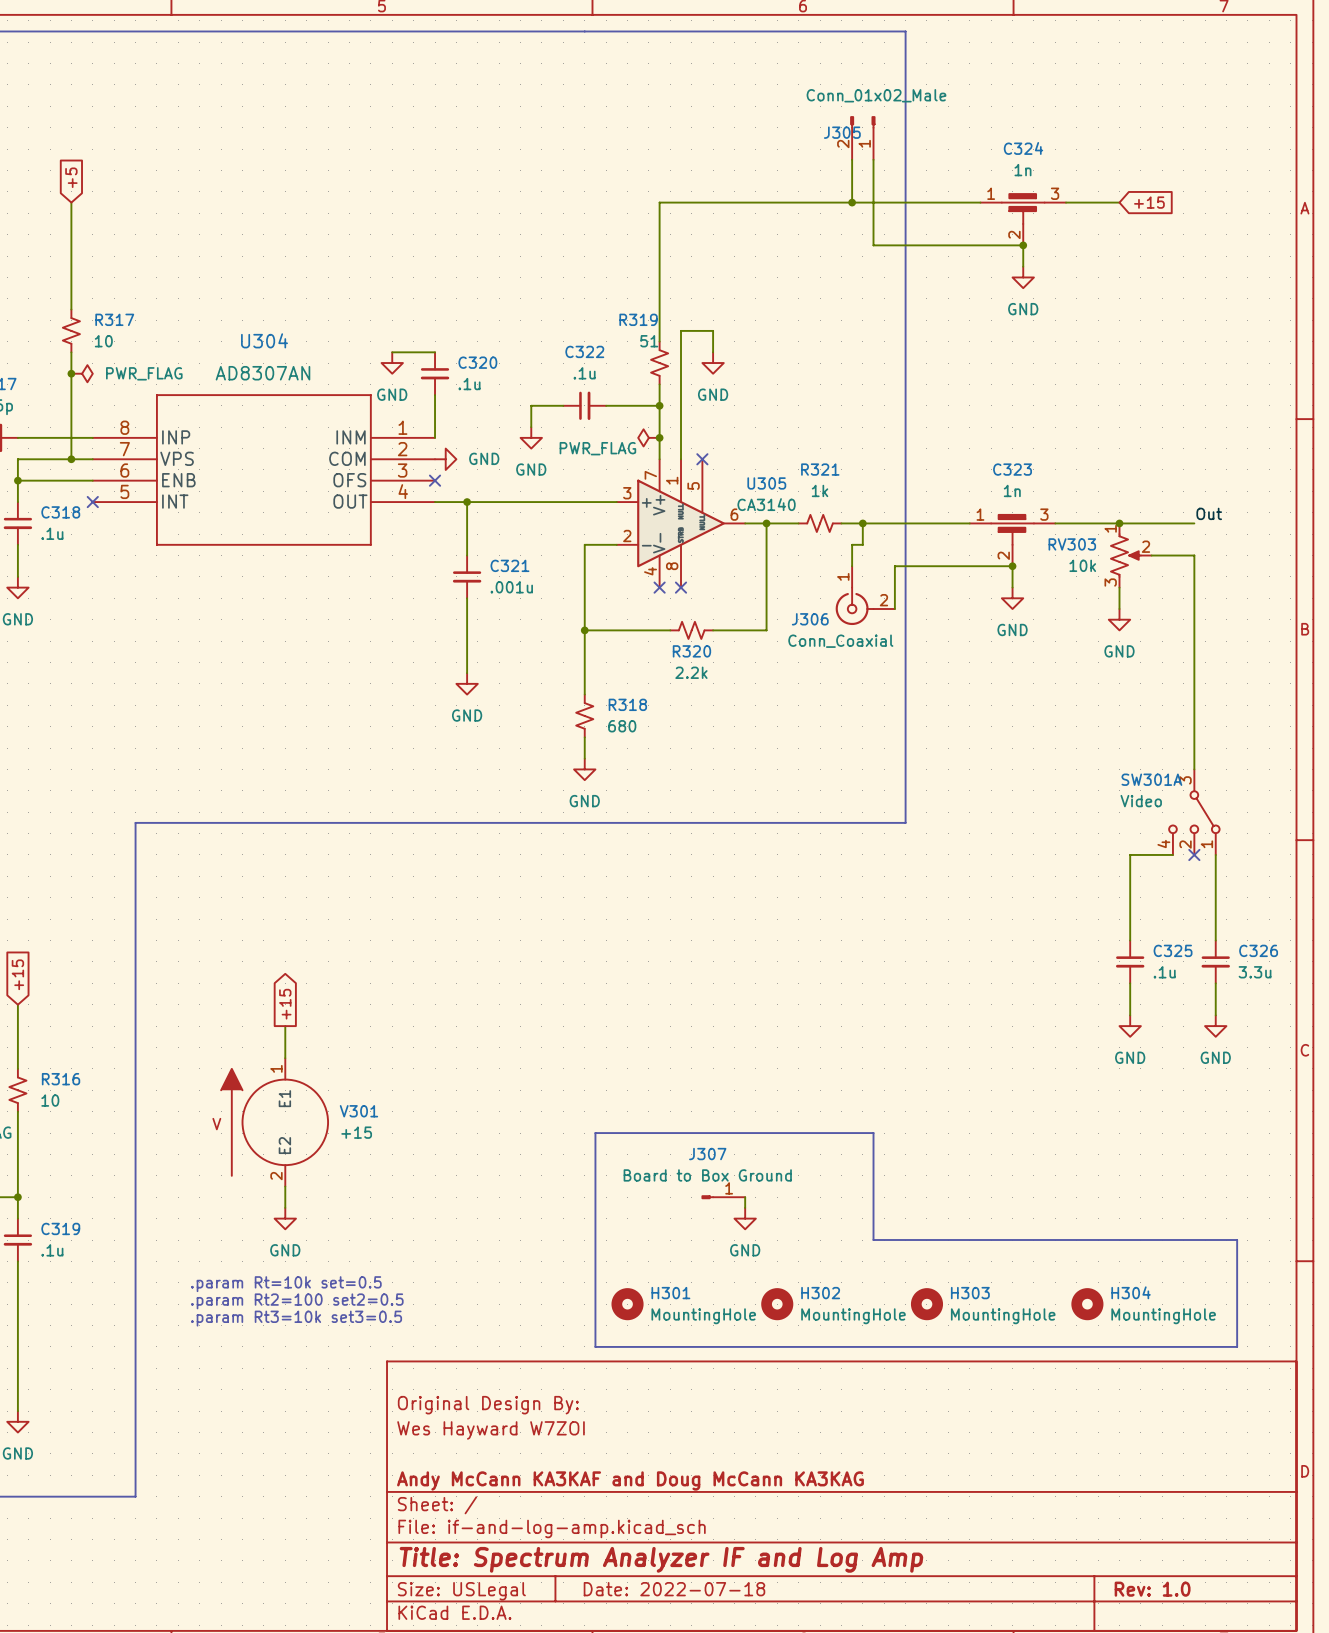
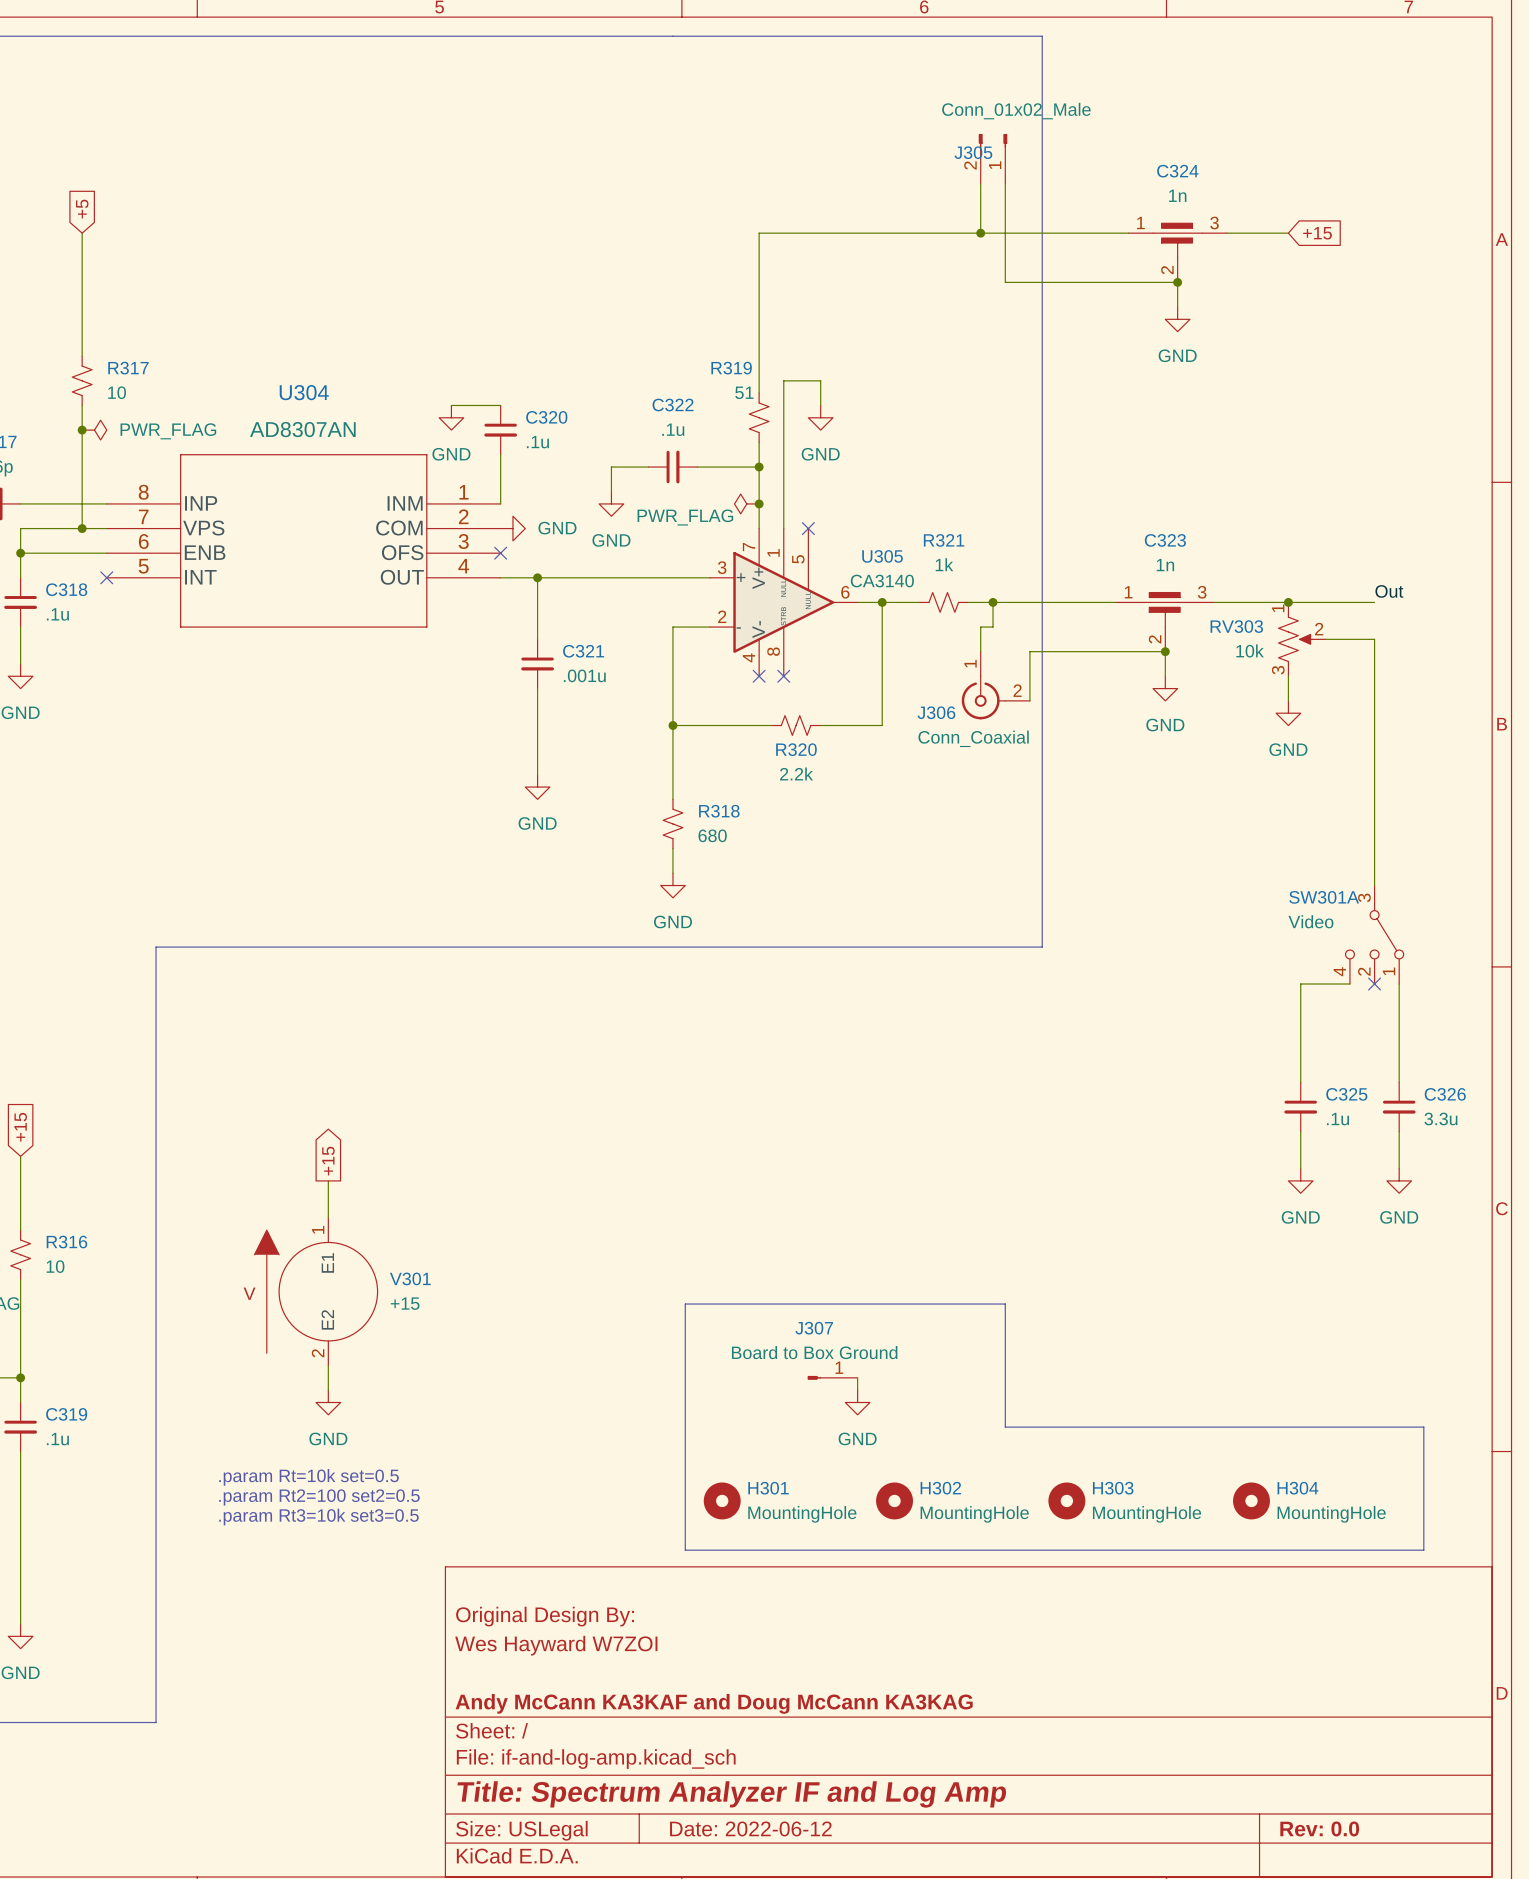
title block: Date: 2022-07-18 (674, 1589) -> Date: 2022-06-12 (750, 1828)
title block: Rev: 1.0 (1152, 1589) -> Rev: 0.0 (1319, 1828)

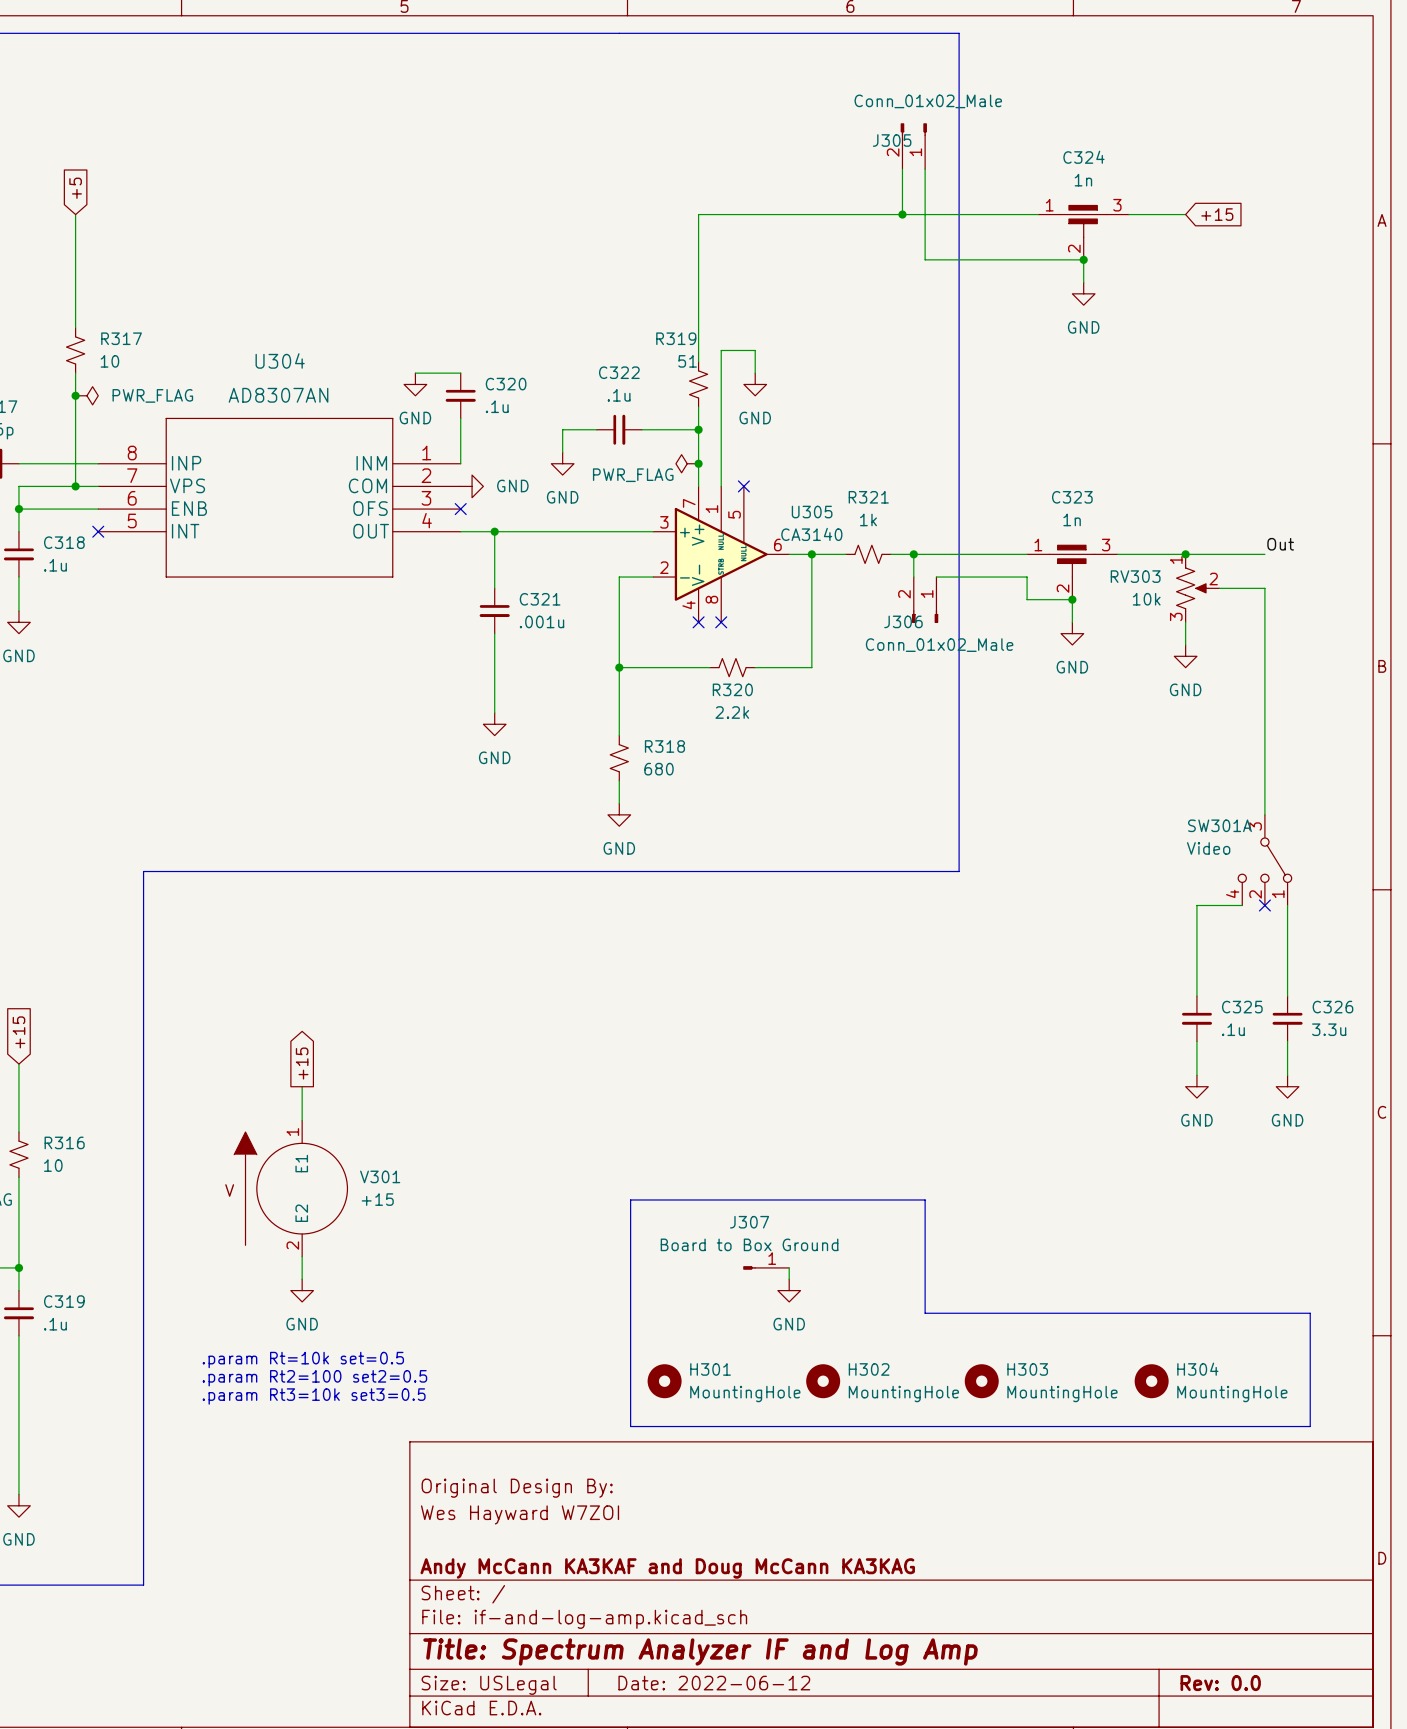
wire: (993, 627) (980, 627) (980, 651) -> none
J306 symbol: [961, 651, 1030, 720] -> [911, 577, 939, 624]
wire: (1116, 651) (1029, 651) (1029, 700) -> (1027, 599) (1027, 577) (936, 577)
J306 name position: J306 (936, 712) -> J306 (903, 621)
J306 value: Conn_Coaxial (973, 738) -> Conn_01x02_Male (939, 645)

